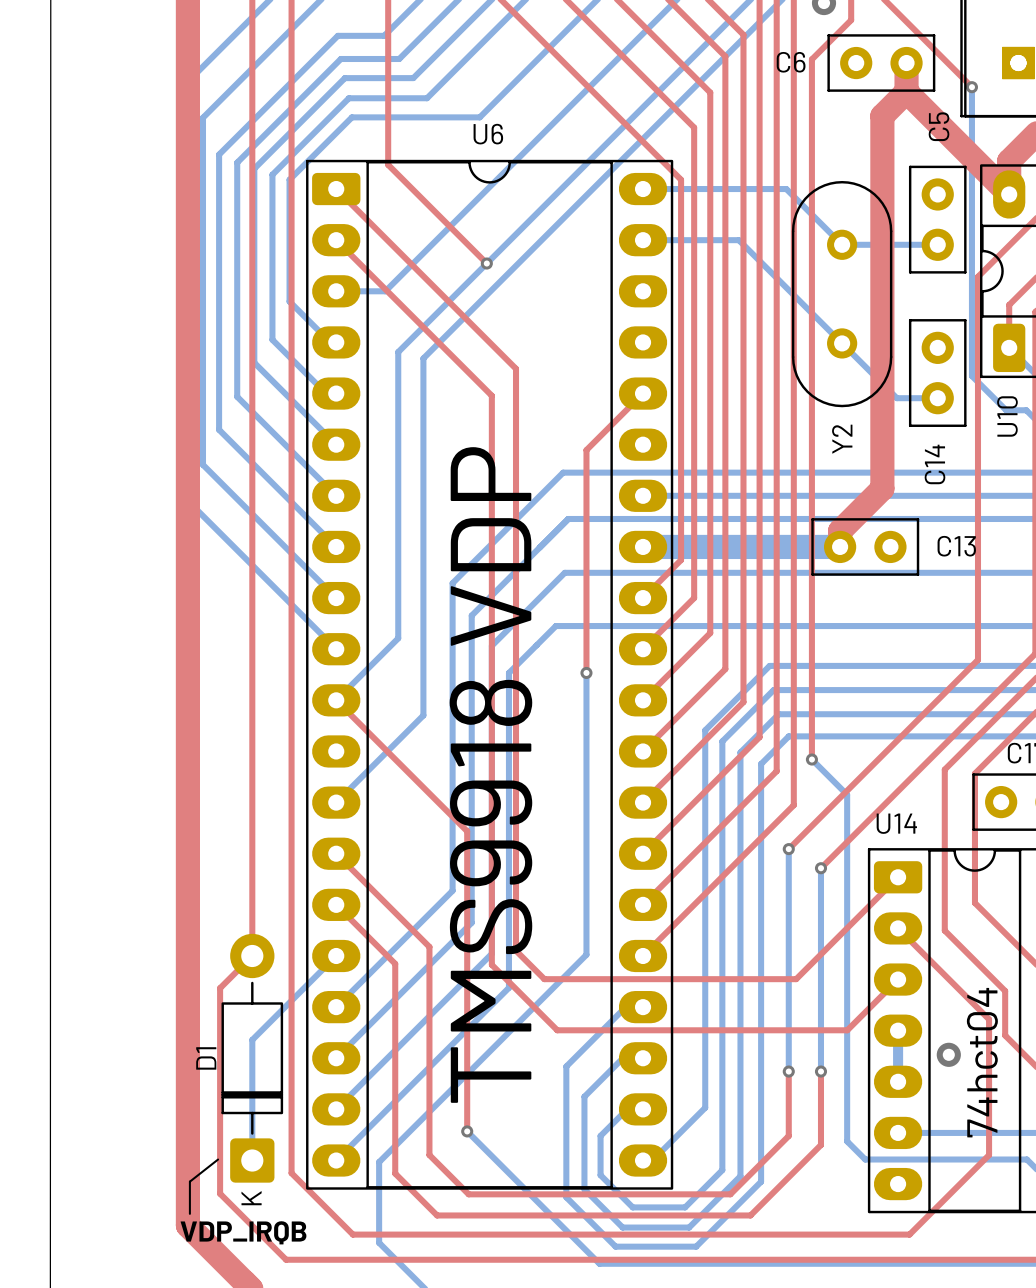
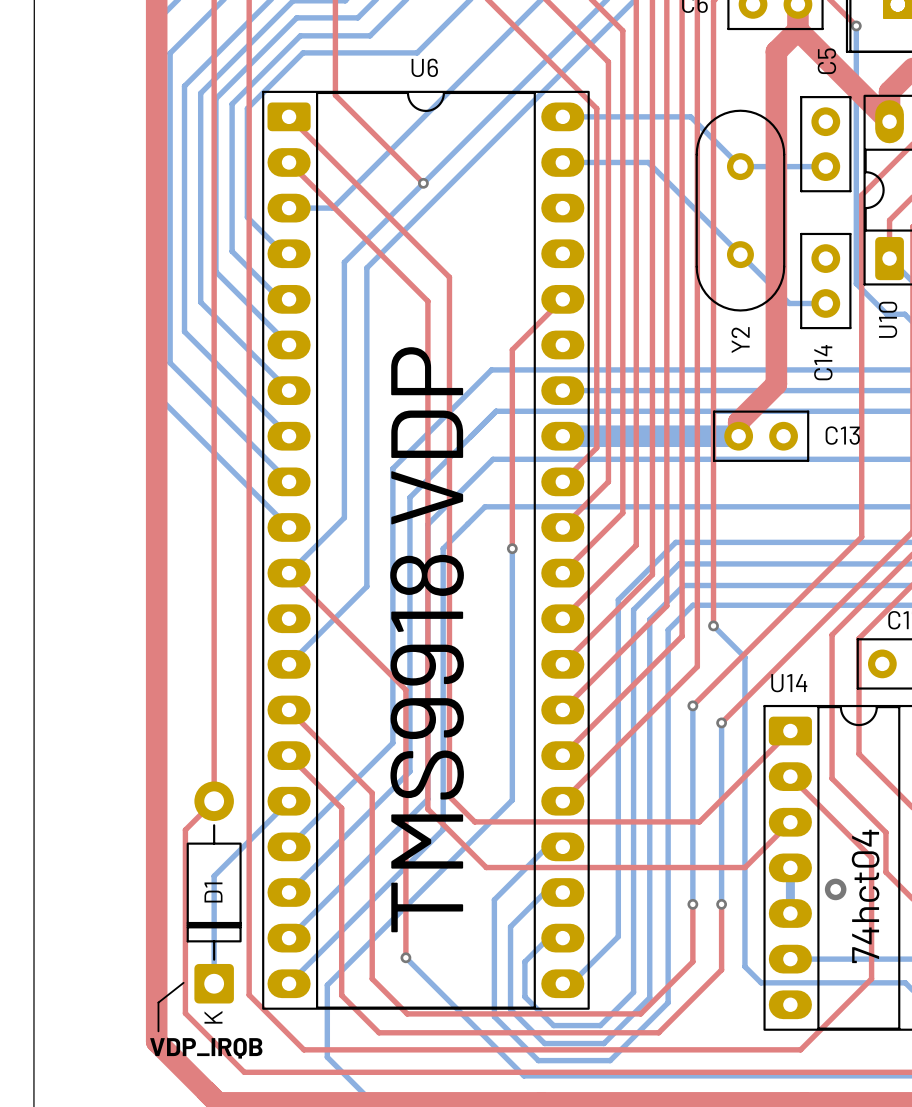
D1 name position: D1 (206, 1058) -> D1 (213, 892)

